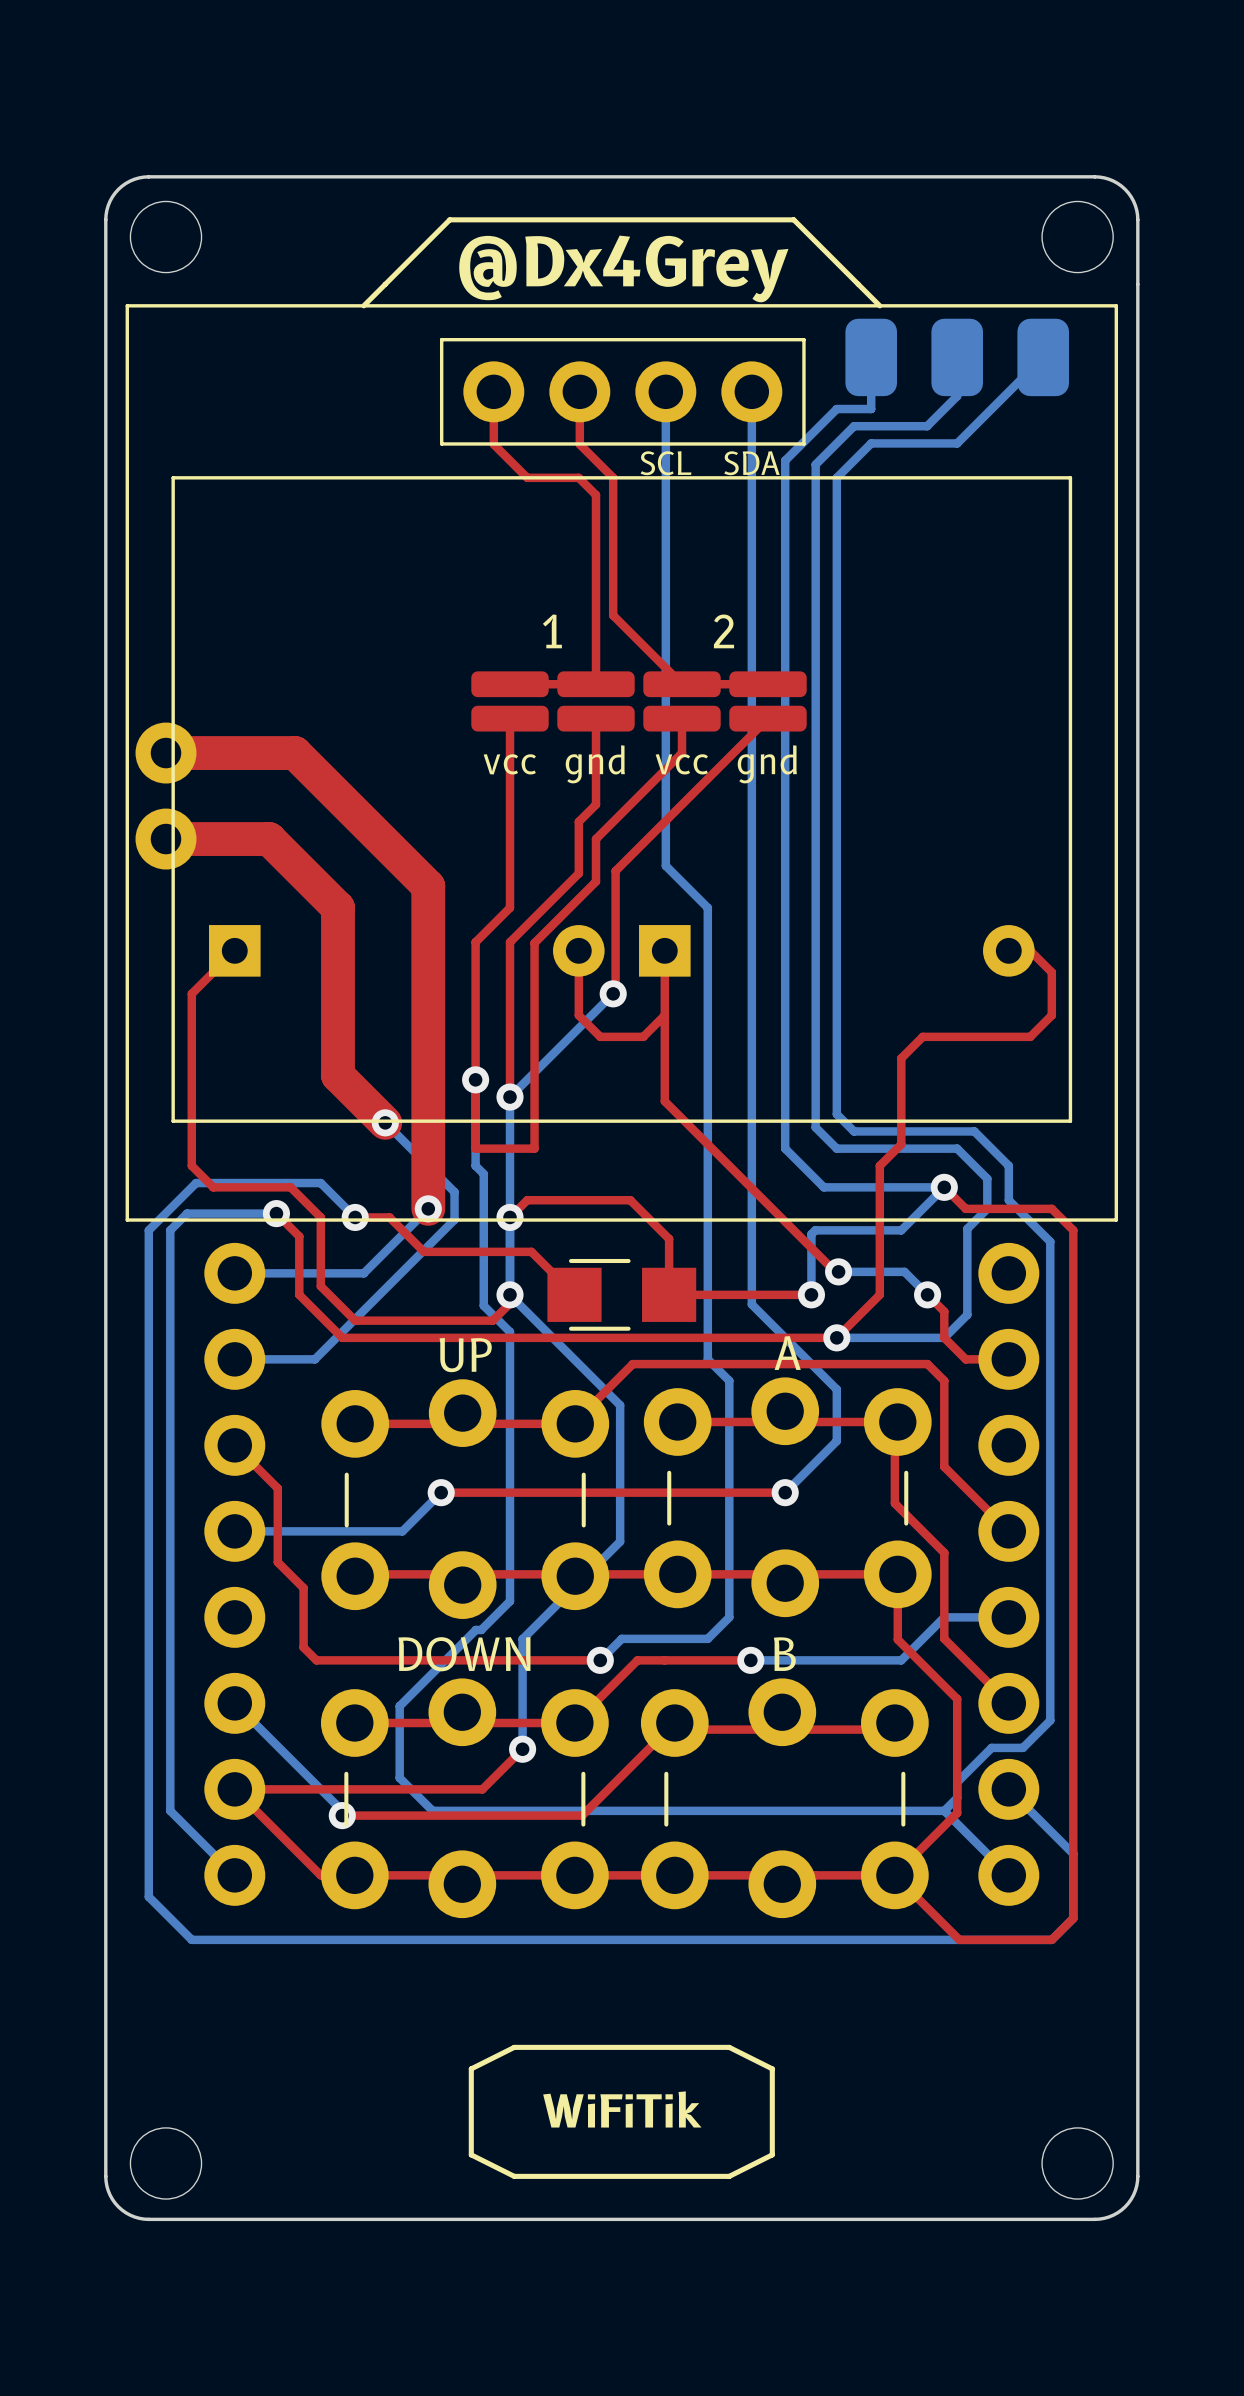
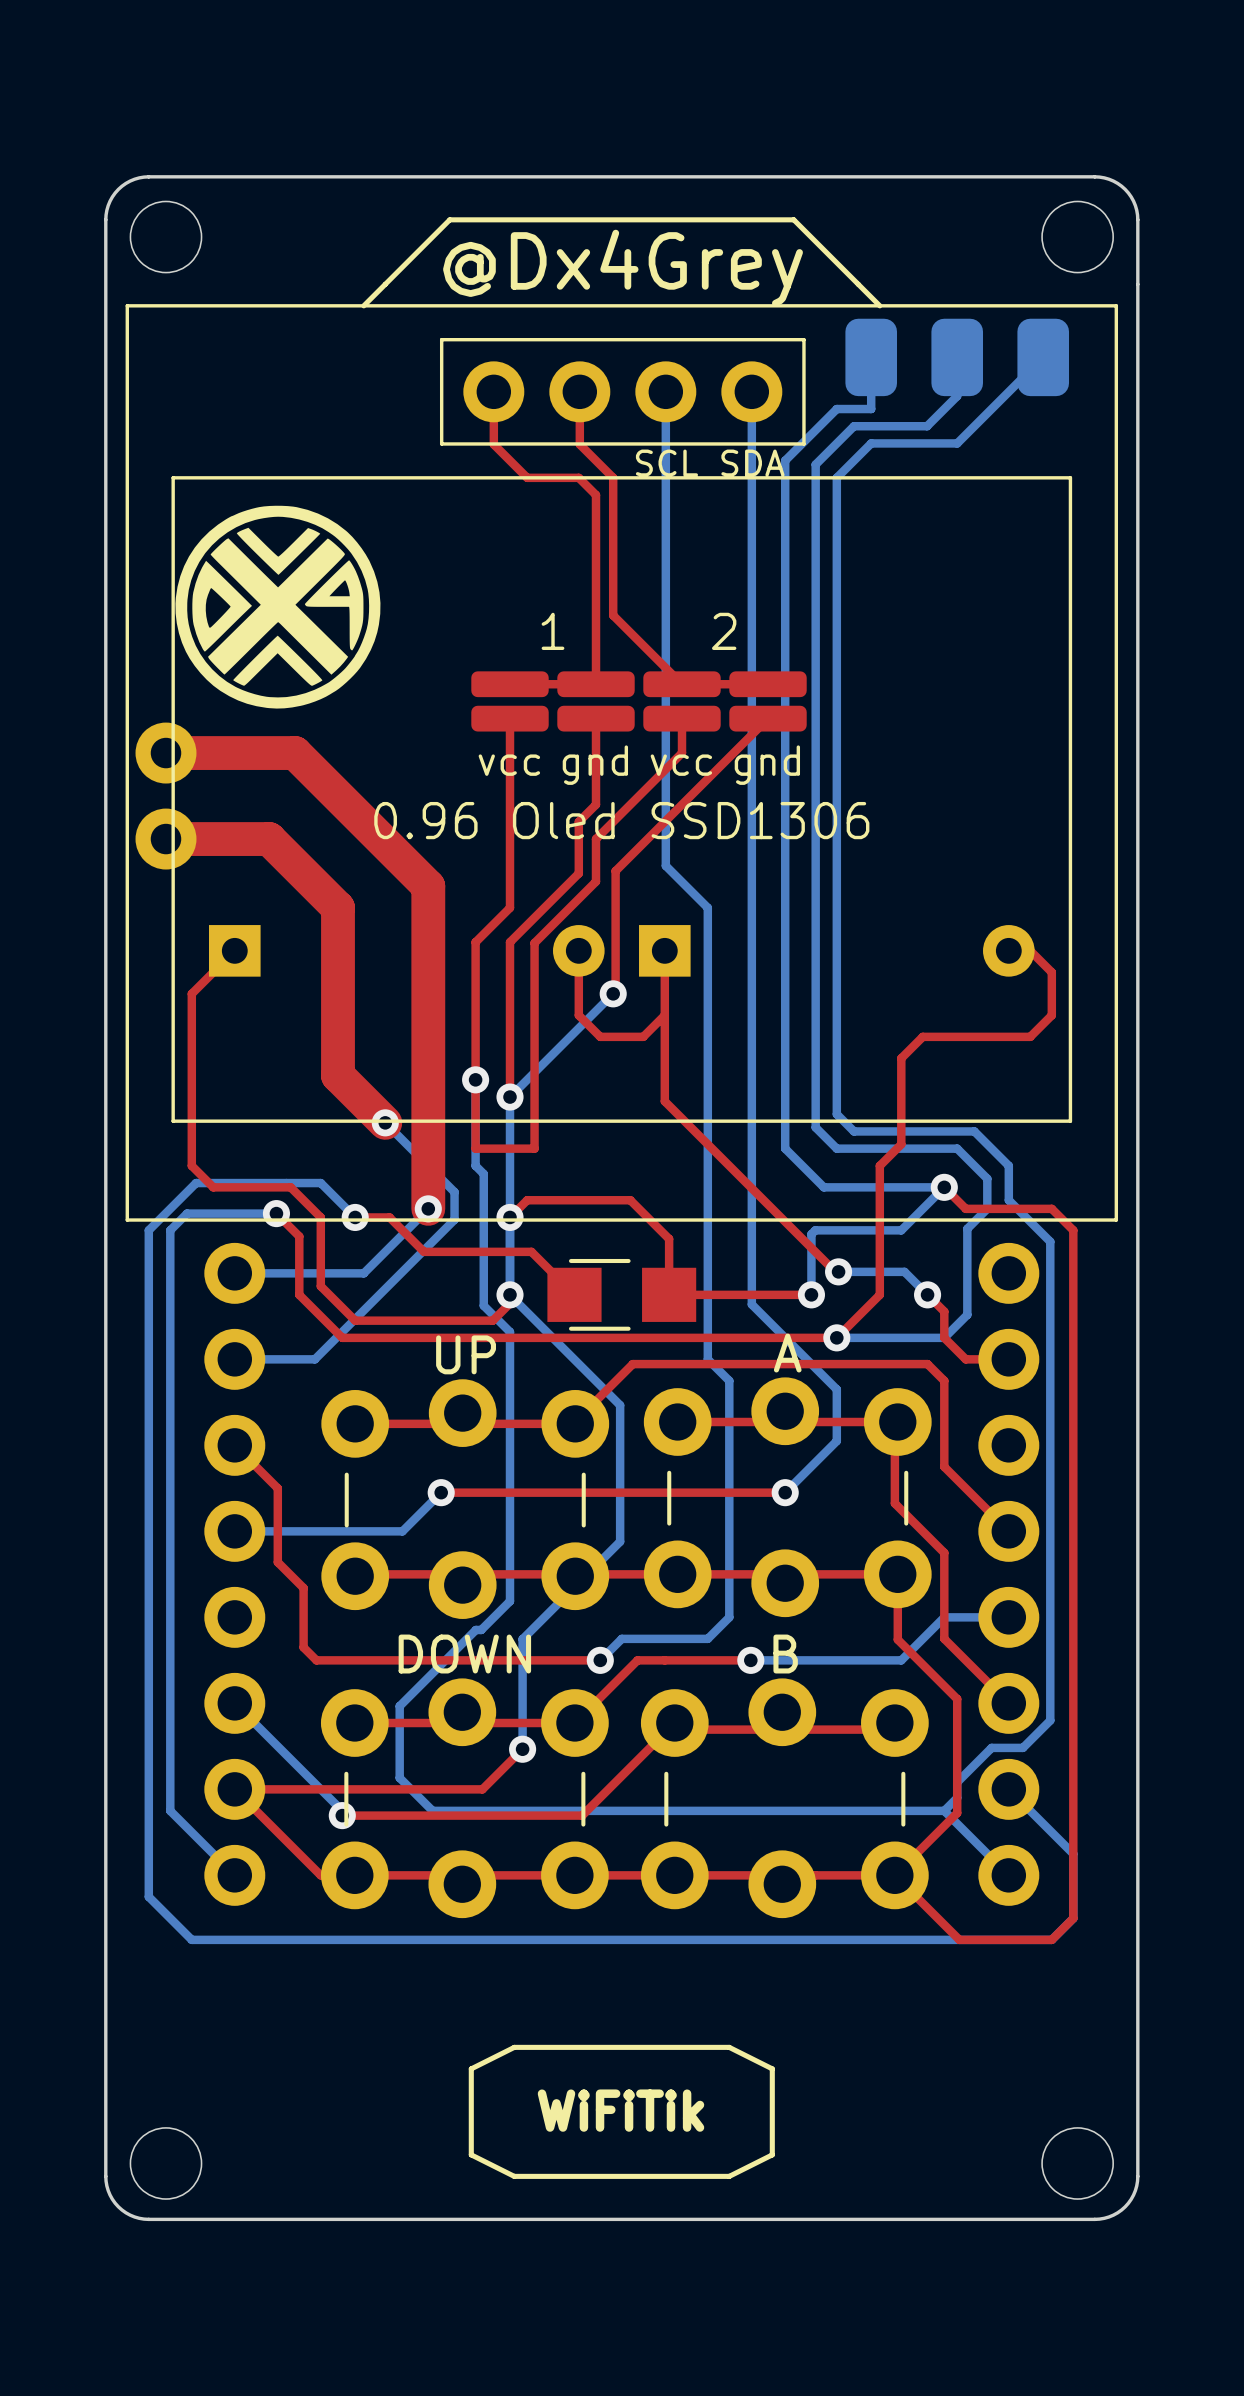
drawing: none -> [175, 505, 381, 709]
0.96 Oled SSD1306 name: none -> 0.96 Oled SSD1306 (621, 820)

